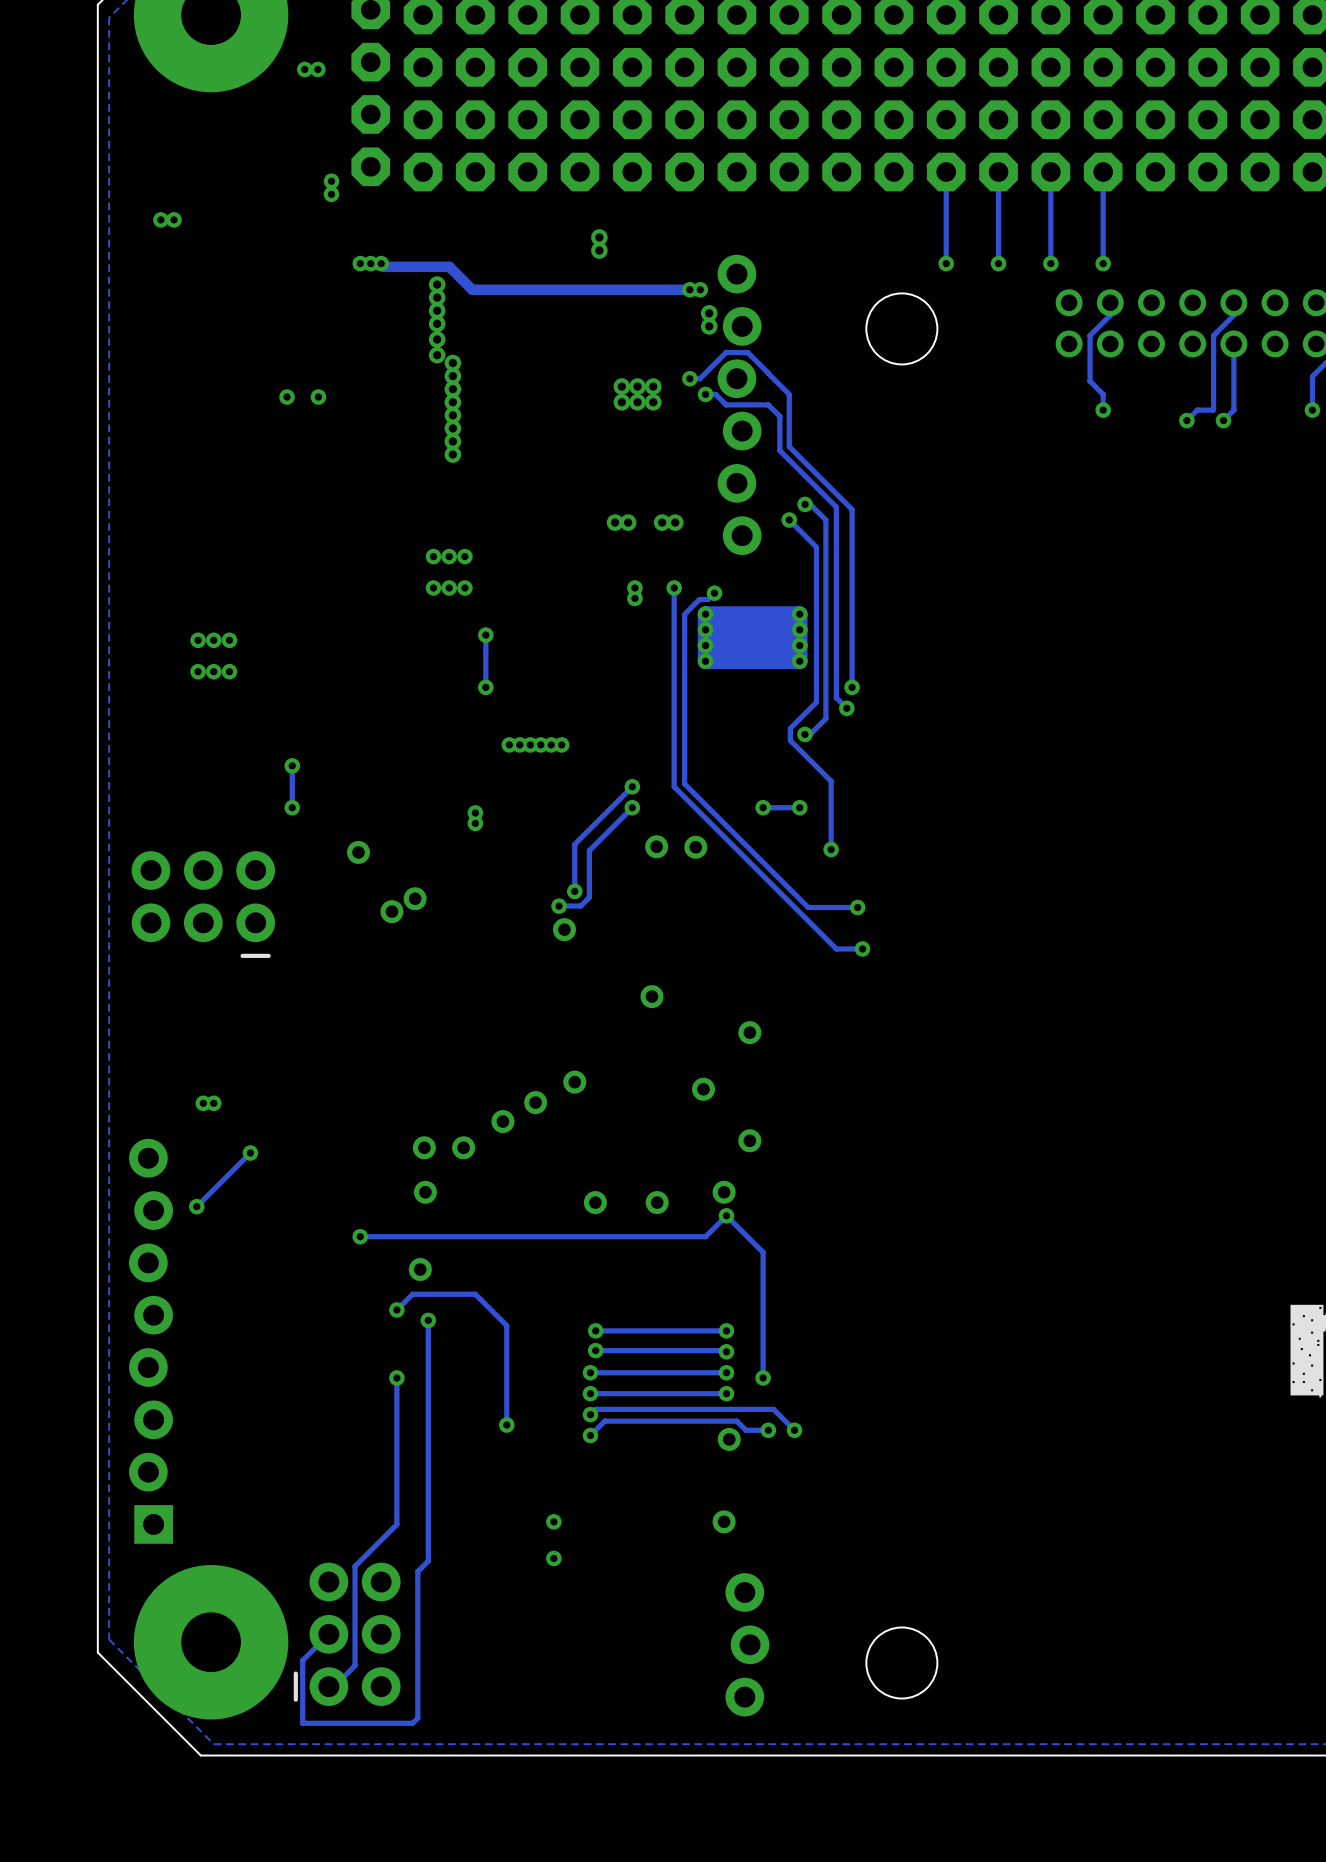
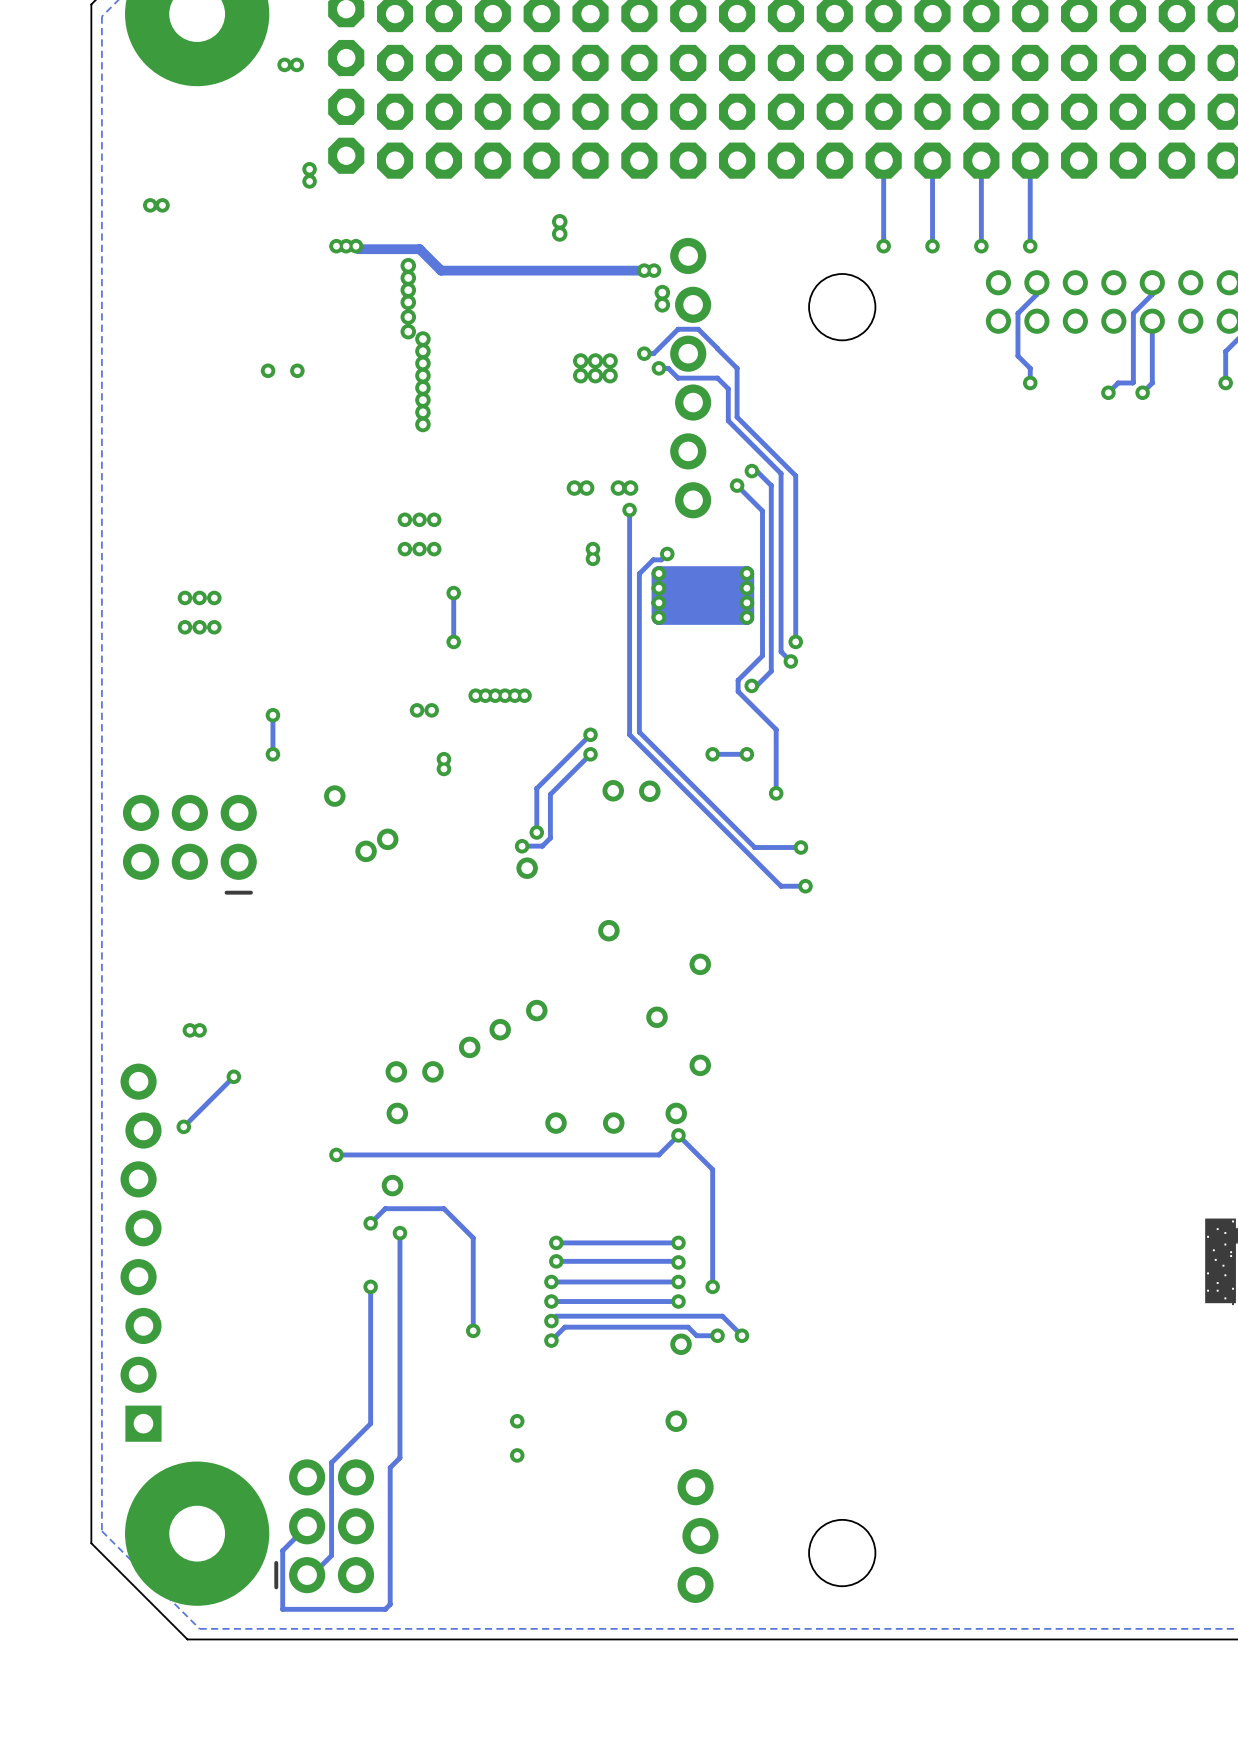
track: none -> (629, 510) (629, 549)
via position: (674, 587) -> (629, 510)
via: none -> (417, 710)
via: none -> (431, 710)

